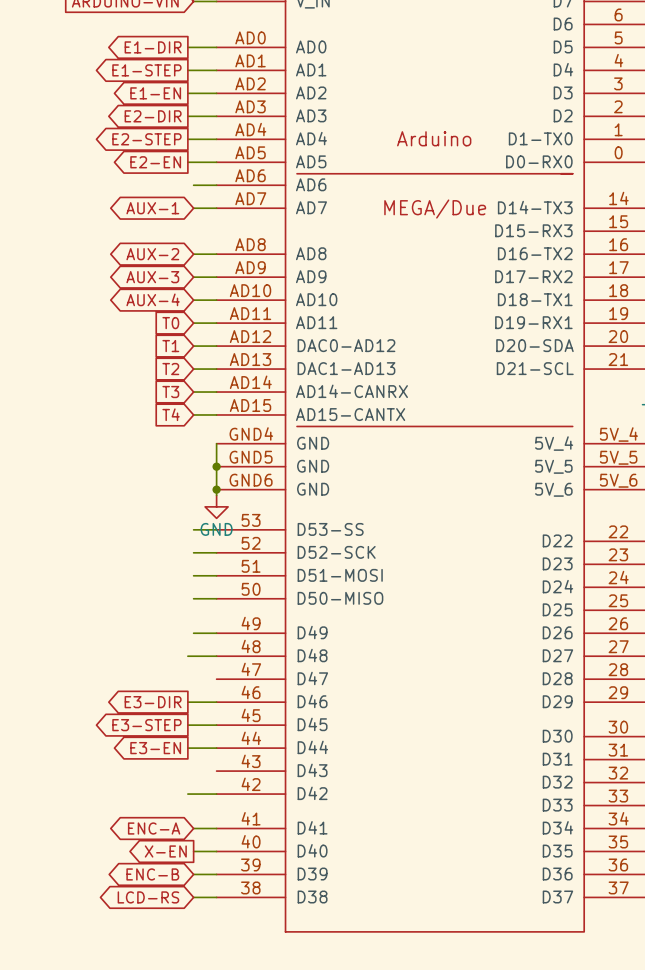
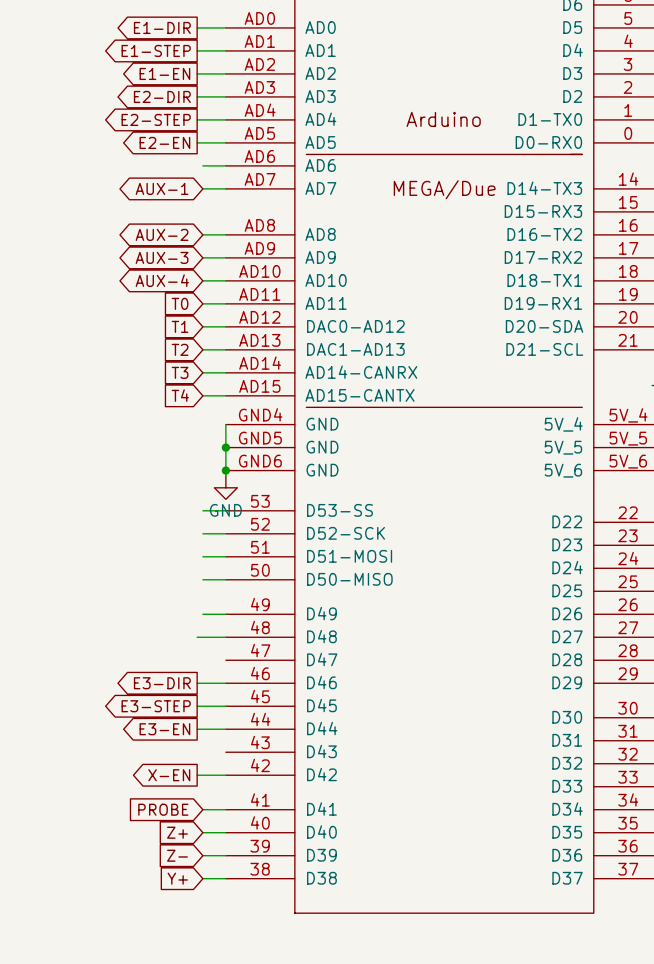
global label: none -> X-EN (169, 775)
global label shape: bidirectional (154, 828) -> input (163, 809)
global label: ENC-A (154, 828) -> PROBE (163, 809)
global label shape: output (165, 851) -> input (177, 832)
global label: X-EN (165, 851) -> Z+ (177, 832)
global label shape: bidirectional (152, 874) -> input (177, 855)
global label: ENC-B (152, 874) -> Z- (177, 855)
global label shape: bidirectional (148, 897) -> input (177, 878)
global label: LCD-RS (148, 897) -> Y+ (177, 878)

